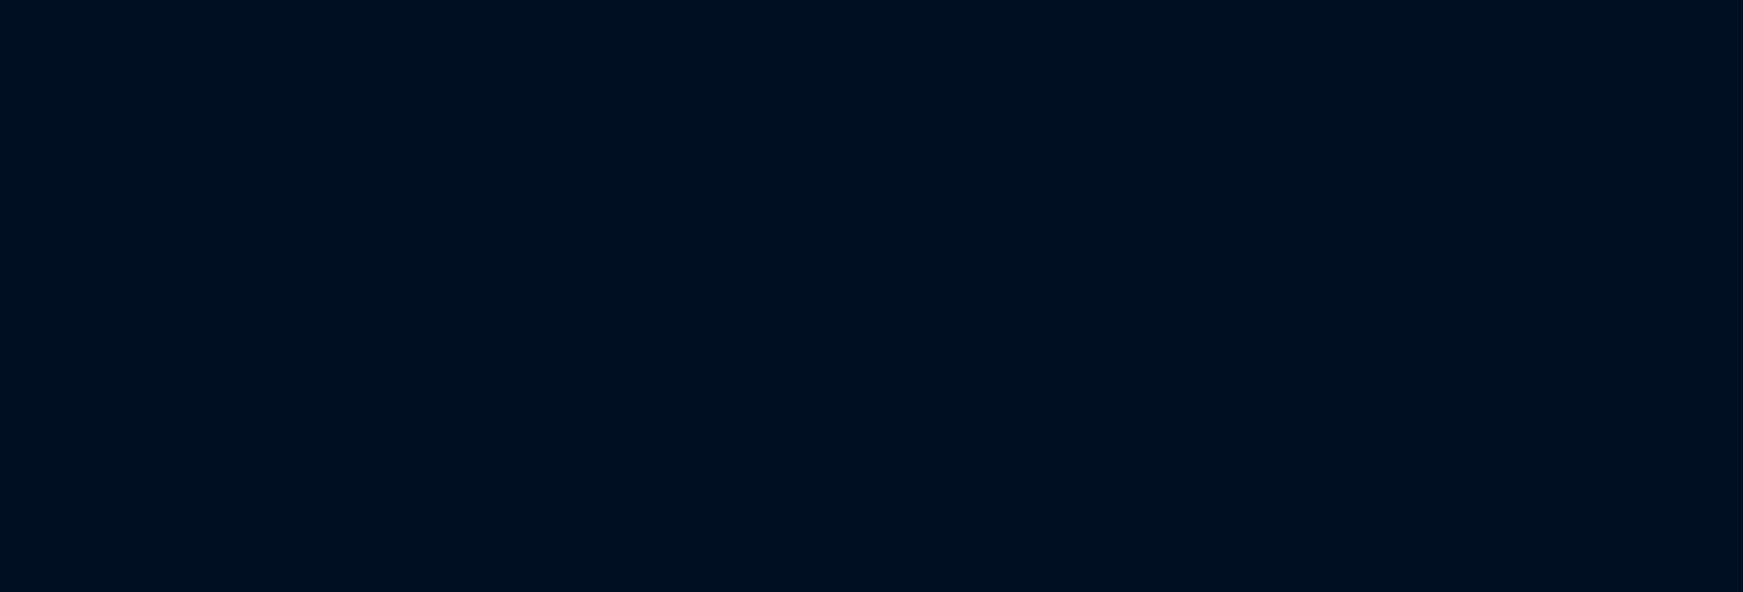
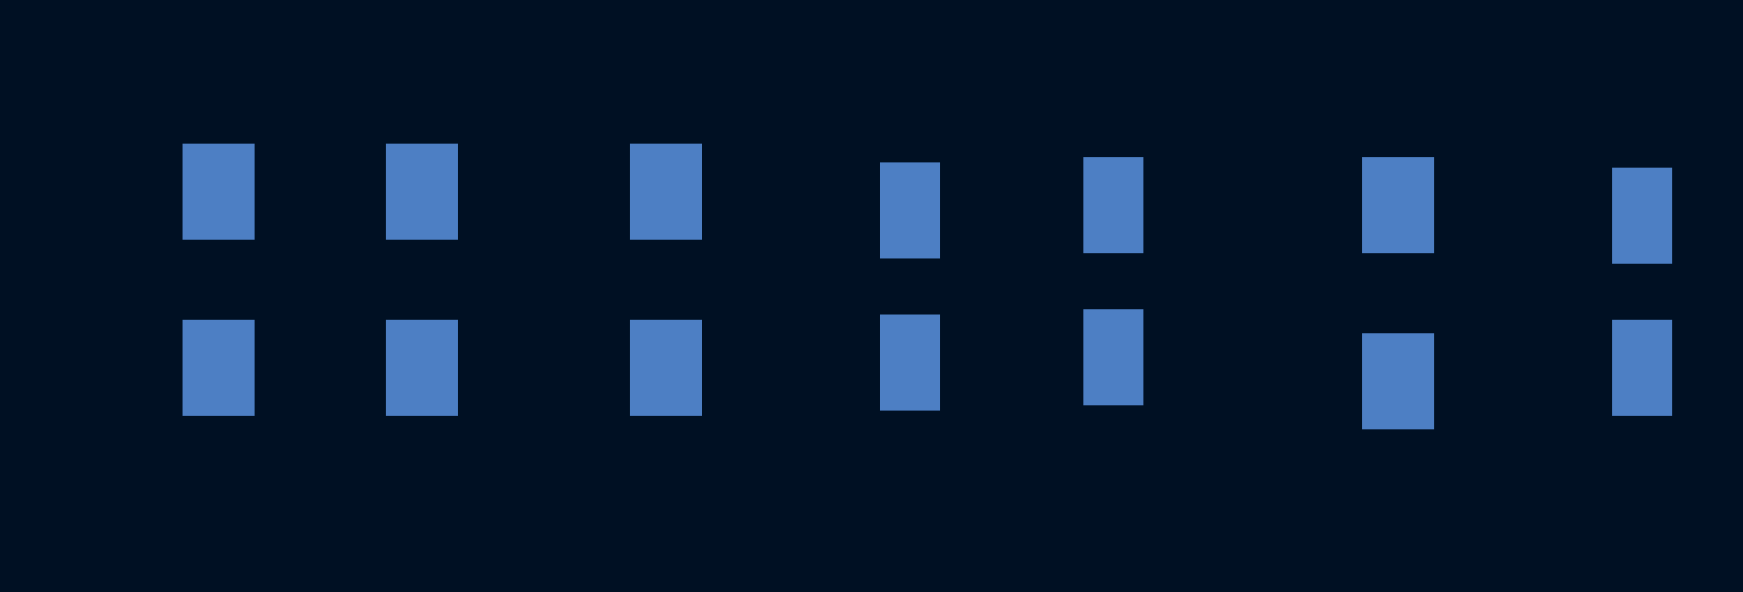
part: none -> (218, 279)
part: none -> (421, 279)
part: none -> (665, 279)
part: none -> (1113, 281)
part: none -> (910, 286)
part: none -> (1642, 291)
part: none -> (1398, 293)

